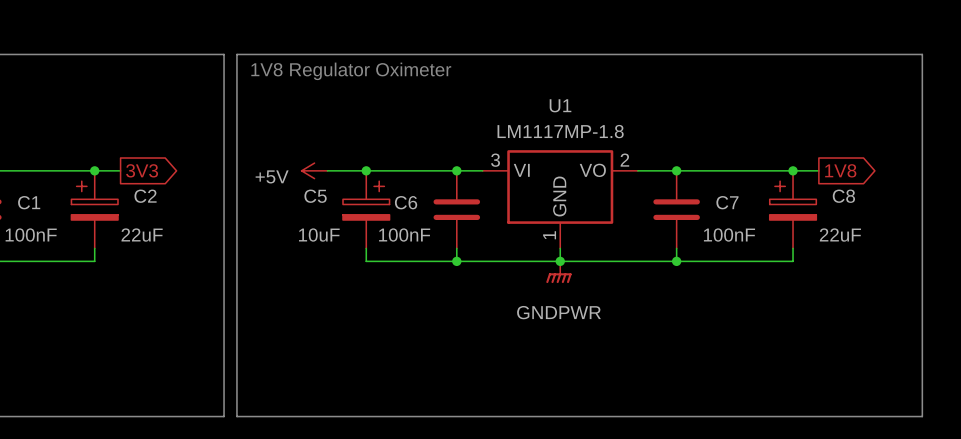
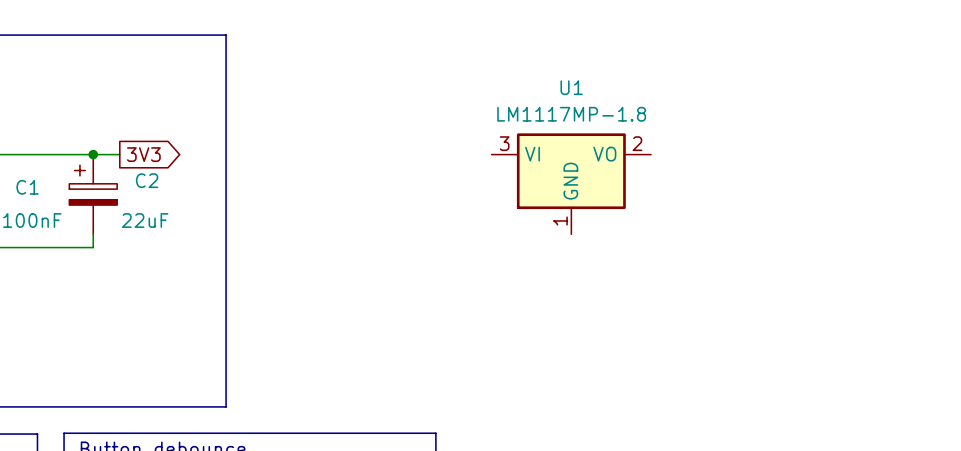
line: (236, 54) (922, 54) (922, 416) (236, 416) (236, 54) -> none
text: 1V8 Regulator Oximeter (351, 71) -> none
power symbol: +5V (314, 170) -> none
wire: (327, 170) (482, 170) -> none
junction: (366, 170) -> none
junction: (456, 170) -> none
wire: (637, 170) (818, 170) -> none
junction: (676, 170) -> none
junction: (793, 170) -> none
global label: 1V8 (840, 170) -> none
C5: 10uF (366, 209) -> none
C6: 100nF (456, 209) -> none
C7: 100nF (676, 209) -> none
C8: 22uF (793, 209) -> none
wire: (366, 248) (366, 261) (793, 261) (793, 248) -> none
wire: (456, 248) (456, 261) -> none
wire: (560, 248) (560, 261) -> none
wire: (676, 248) (676, 261) -> none
junction: (456, 261) -> none
junction: (560, 261) -> none
junction: (676, 261) -> none
power symbol: GNDPWR (558, 272) -> none

